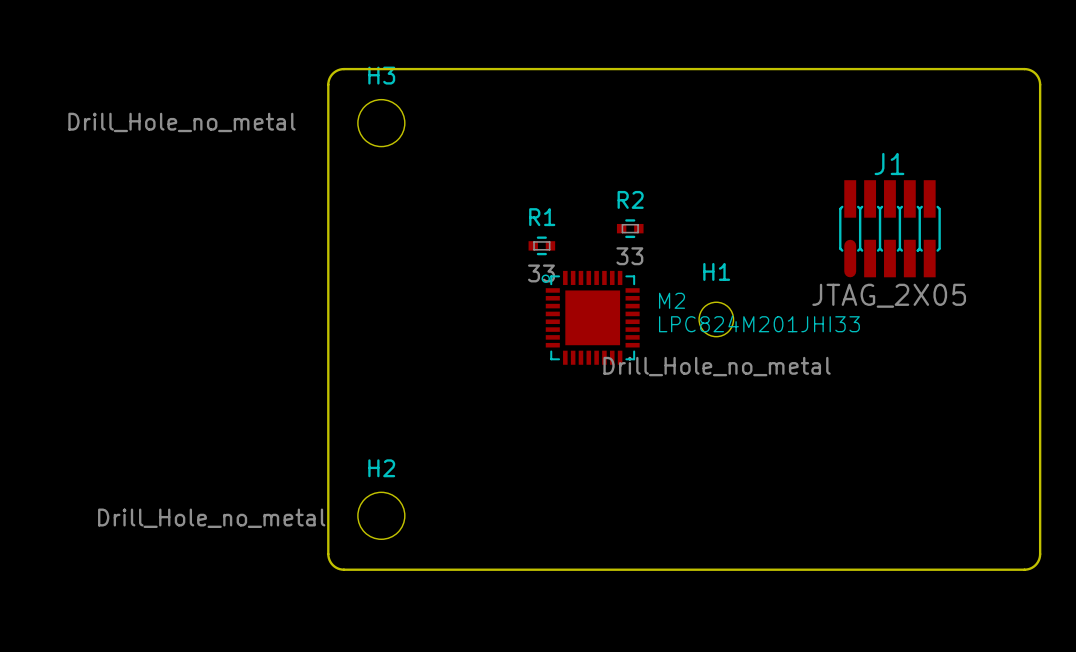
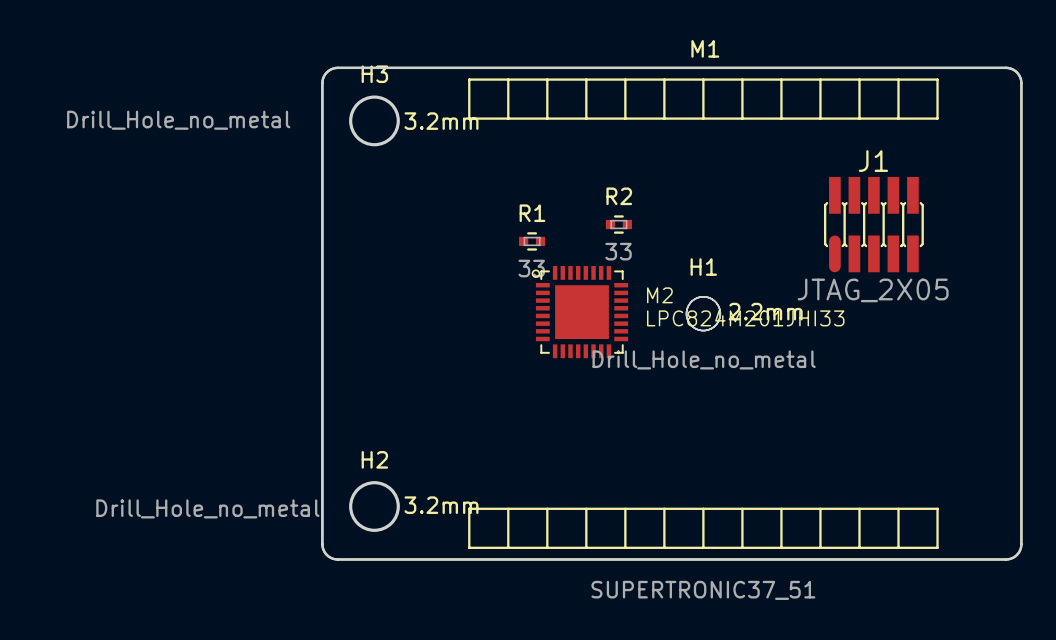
M1: none -> SUPERTRONIC37_51 (671, 313)

